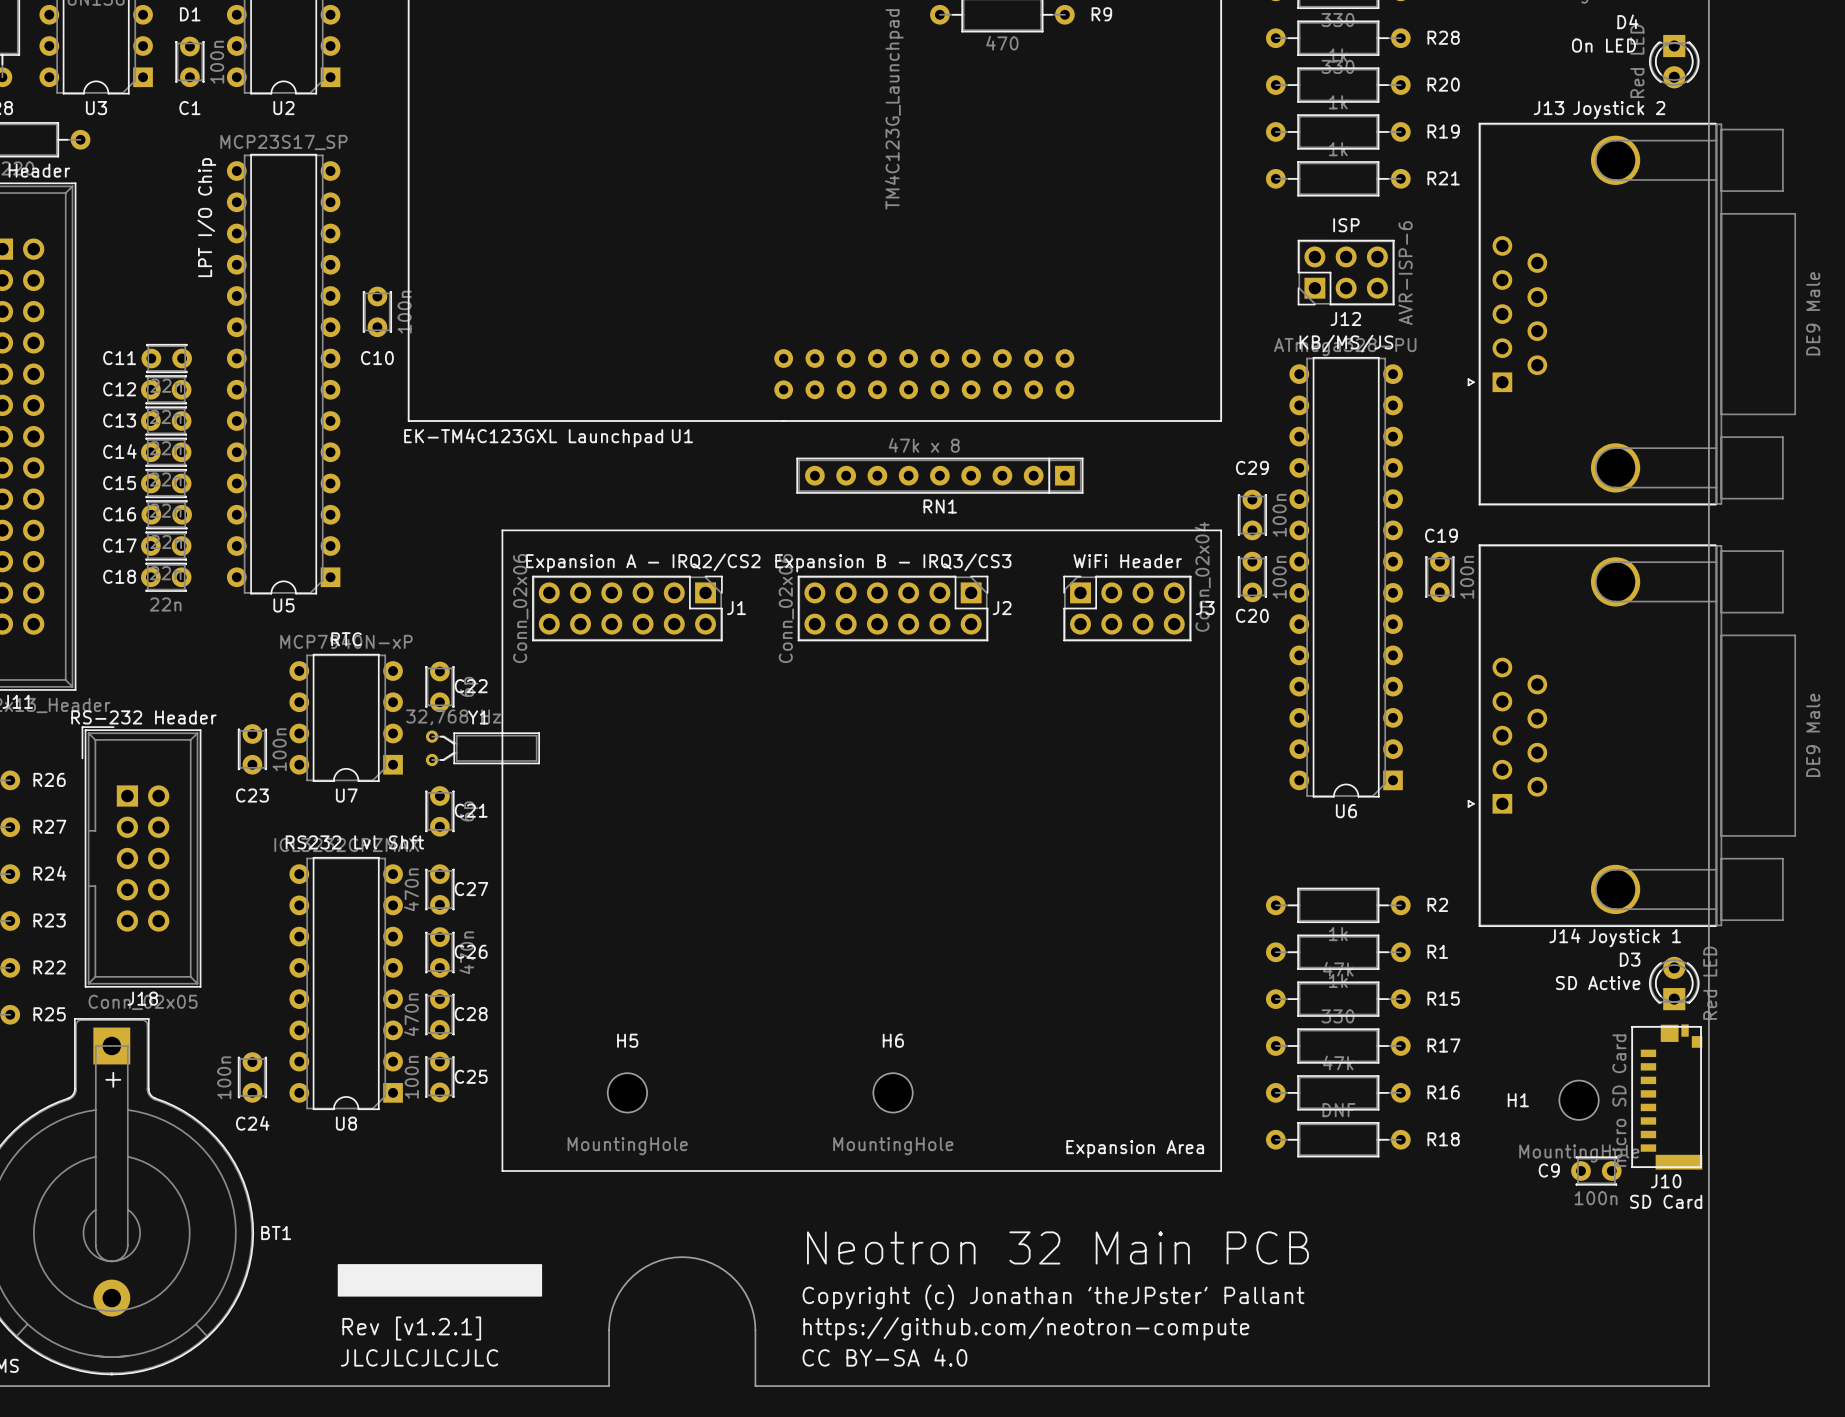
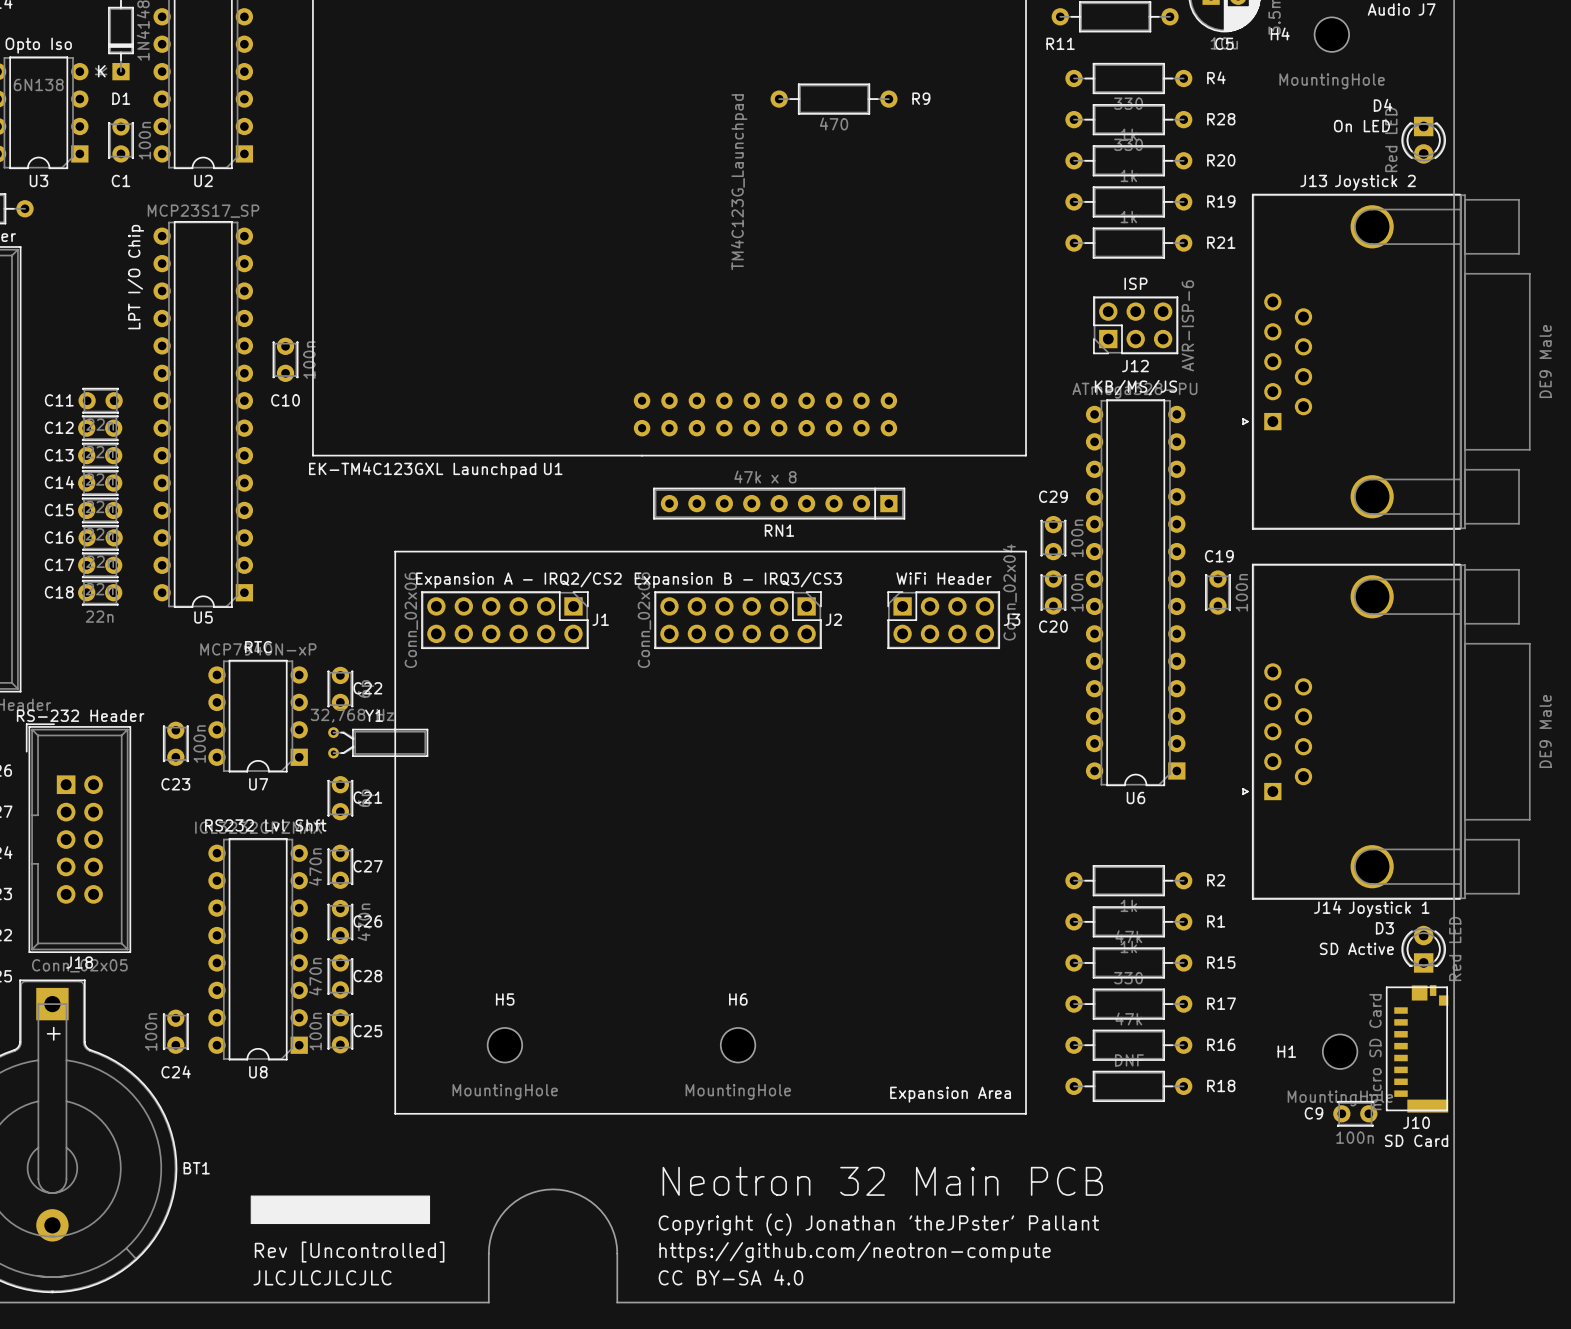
text: Rev [v1.2.1] (411, 1328) -> Rev [Uncontrolled] (349, 1252)

